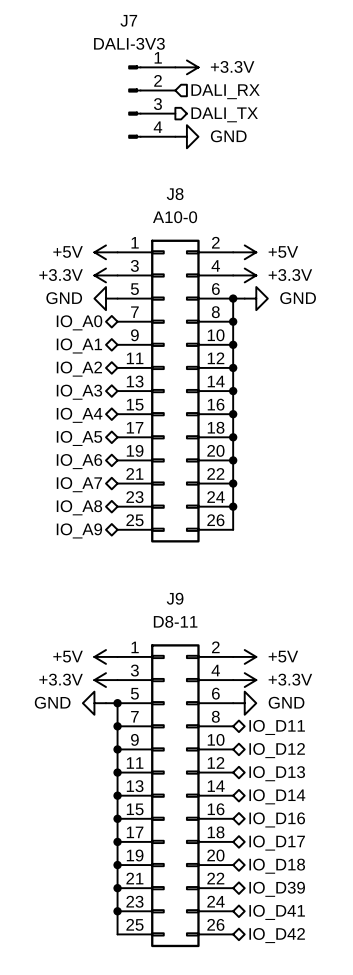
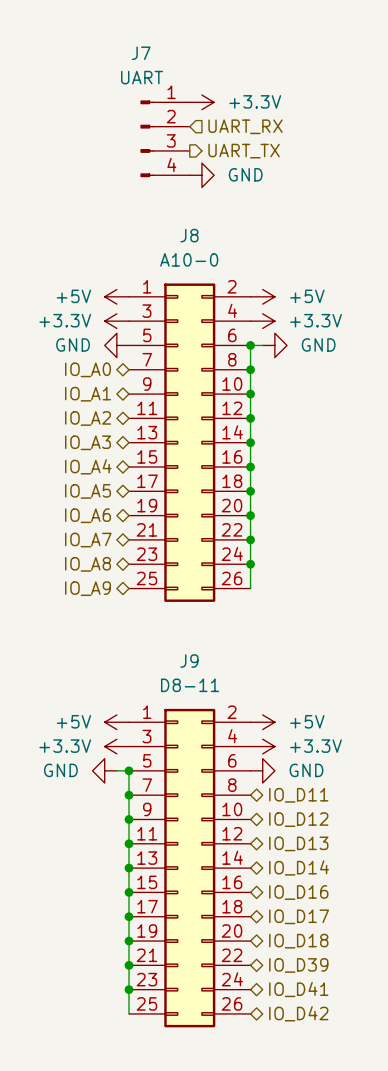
J7 value: DALI-3V3 (129, 43) -> UART (142, 77)
hierarchical label: DALI_RX (225, 91) -> UART_RX (245, 126)
hierarchical label: DALI_TX (224, 114) -> UART_TX (244, 151)

